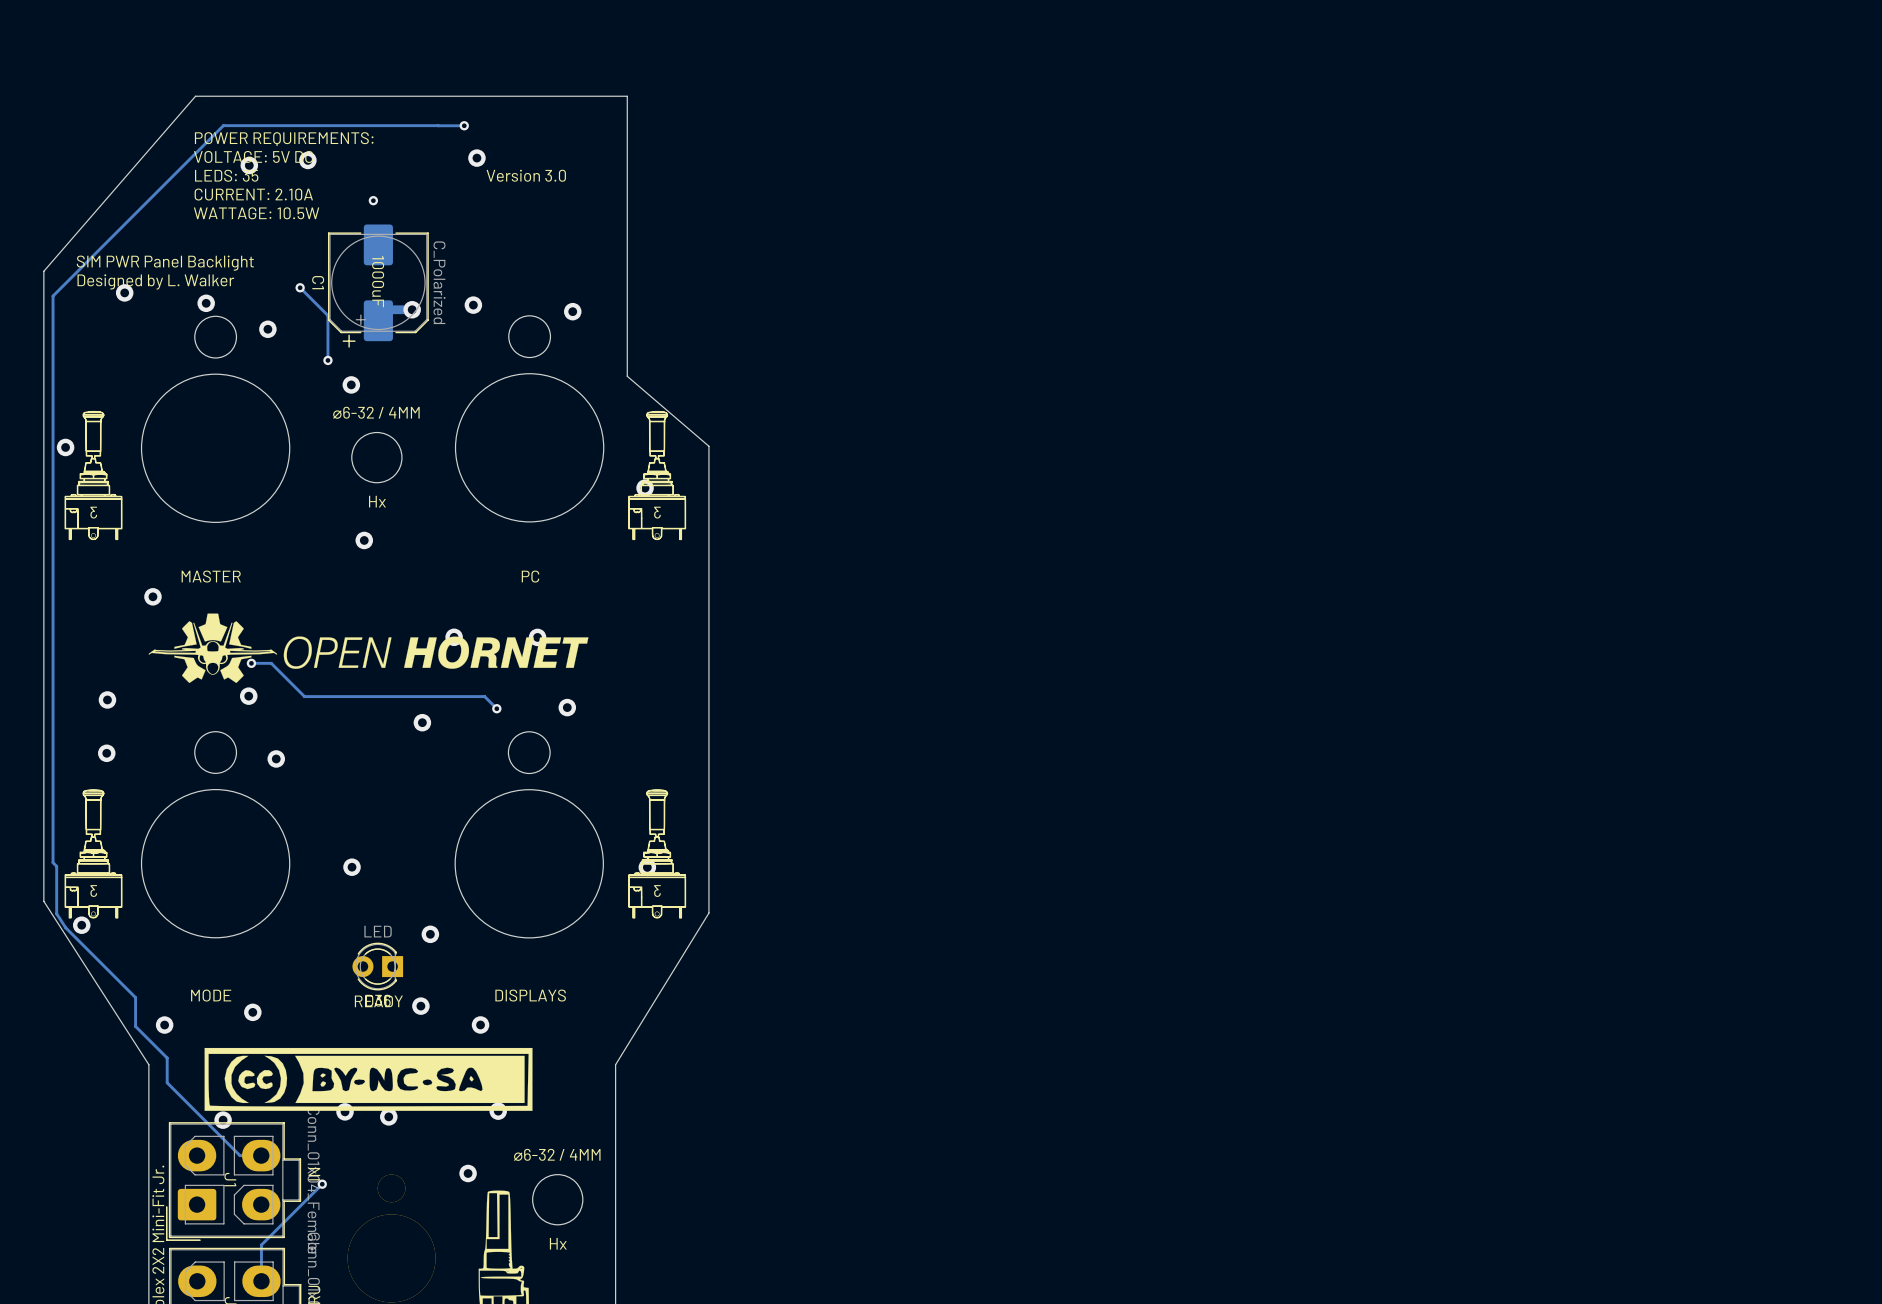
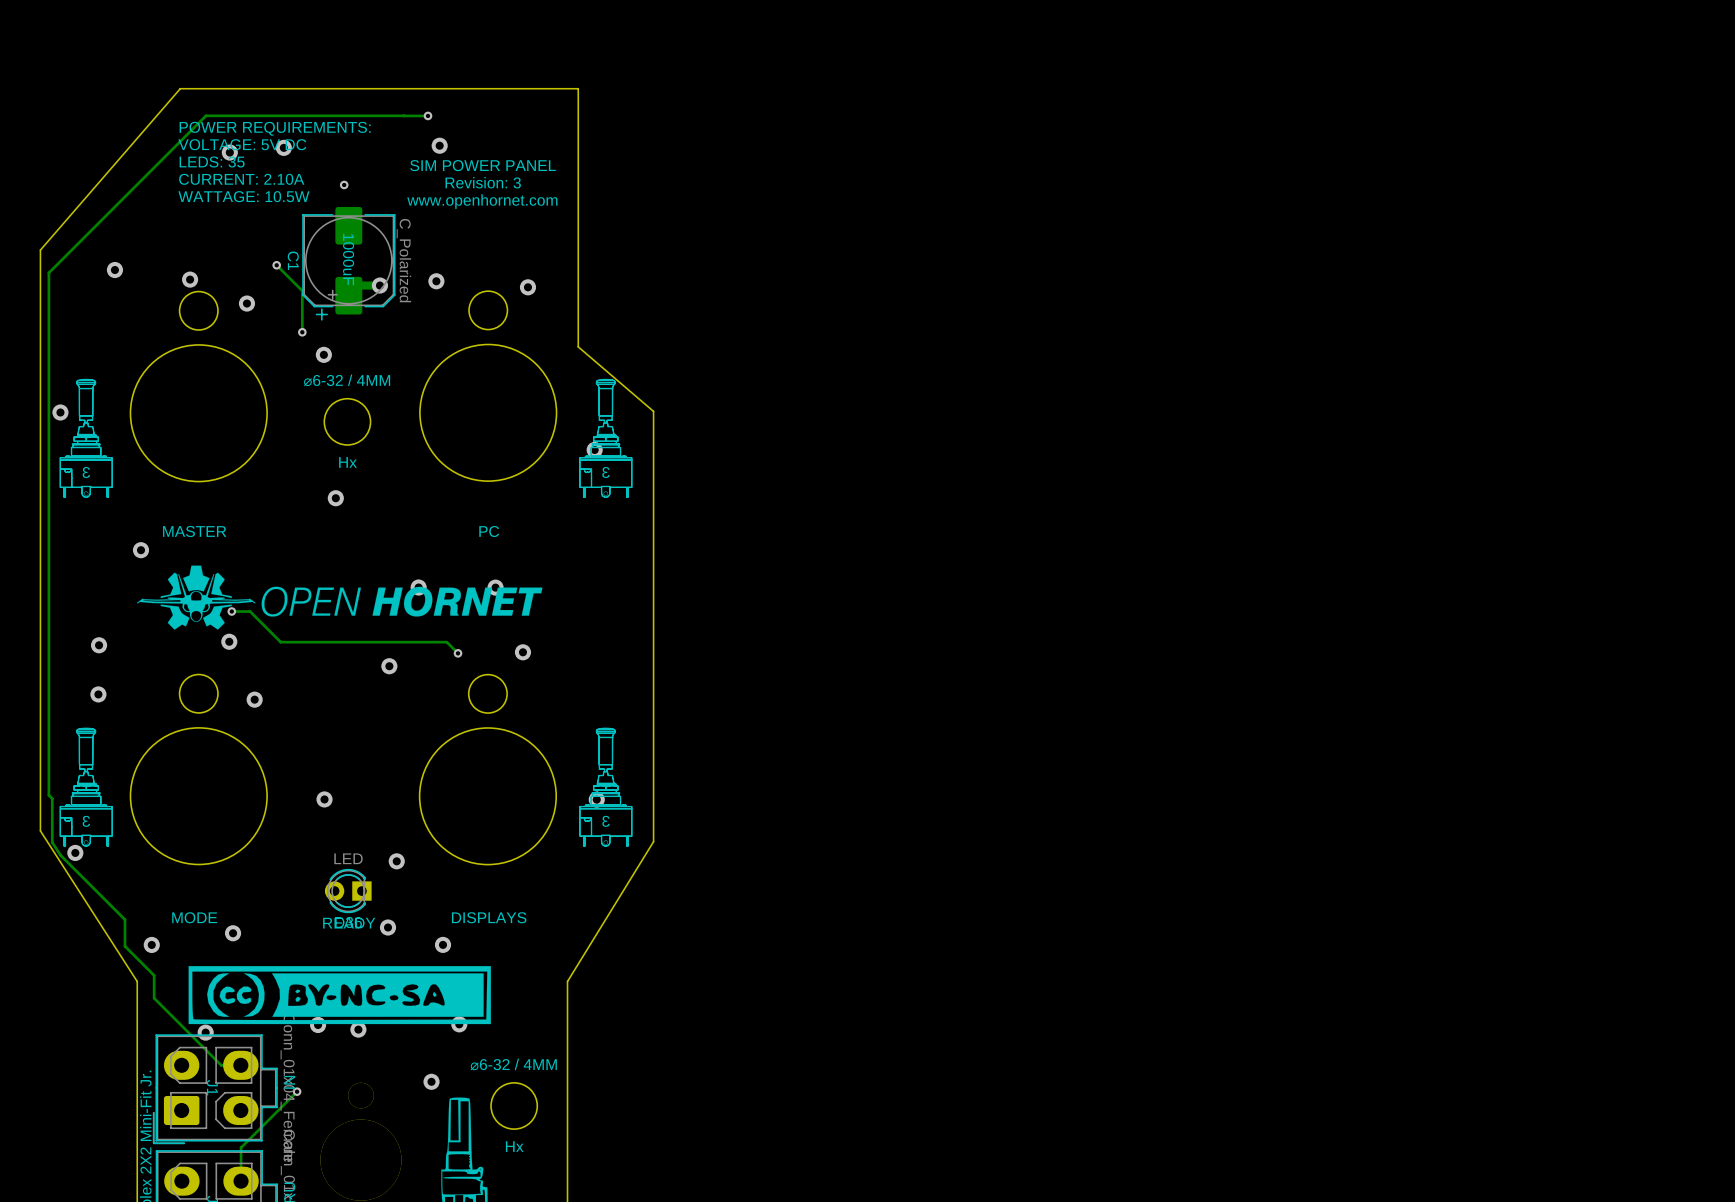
text: Version 3.0 (526, 175) -> SIM POWER PANEL (482, 165)
text: none -> Revision: 3 (483, 182)
text: none -> www.openhornet.com (482, 201)
text: SIM PWR Panel Backlight (165, 263) -> none
text: Designed by L. Walker (155, 281) -> none

